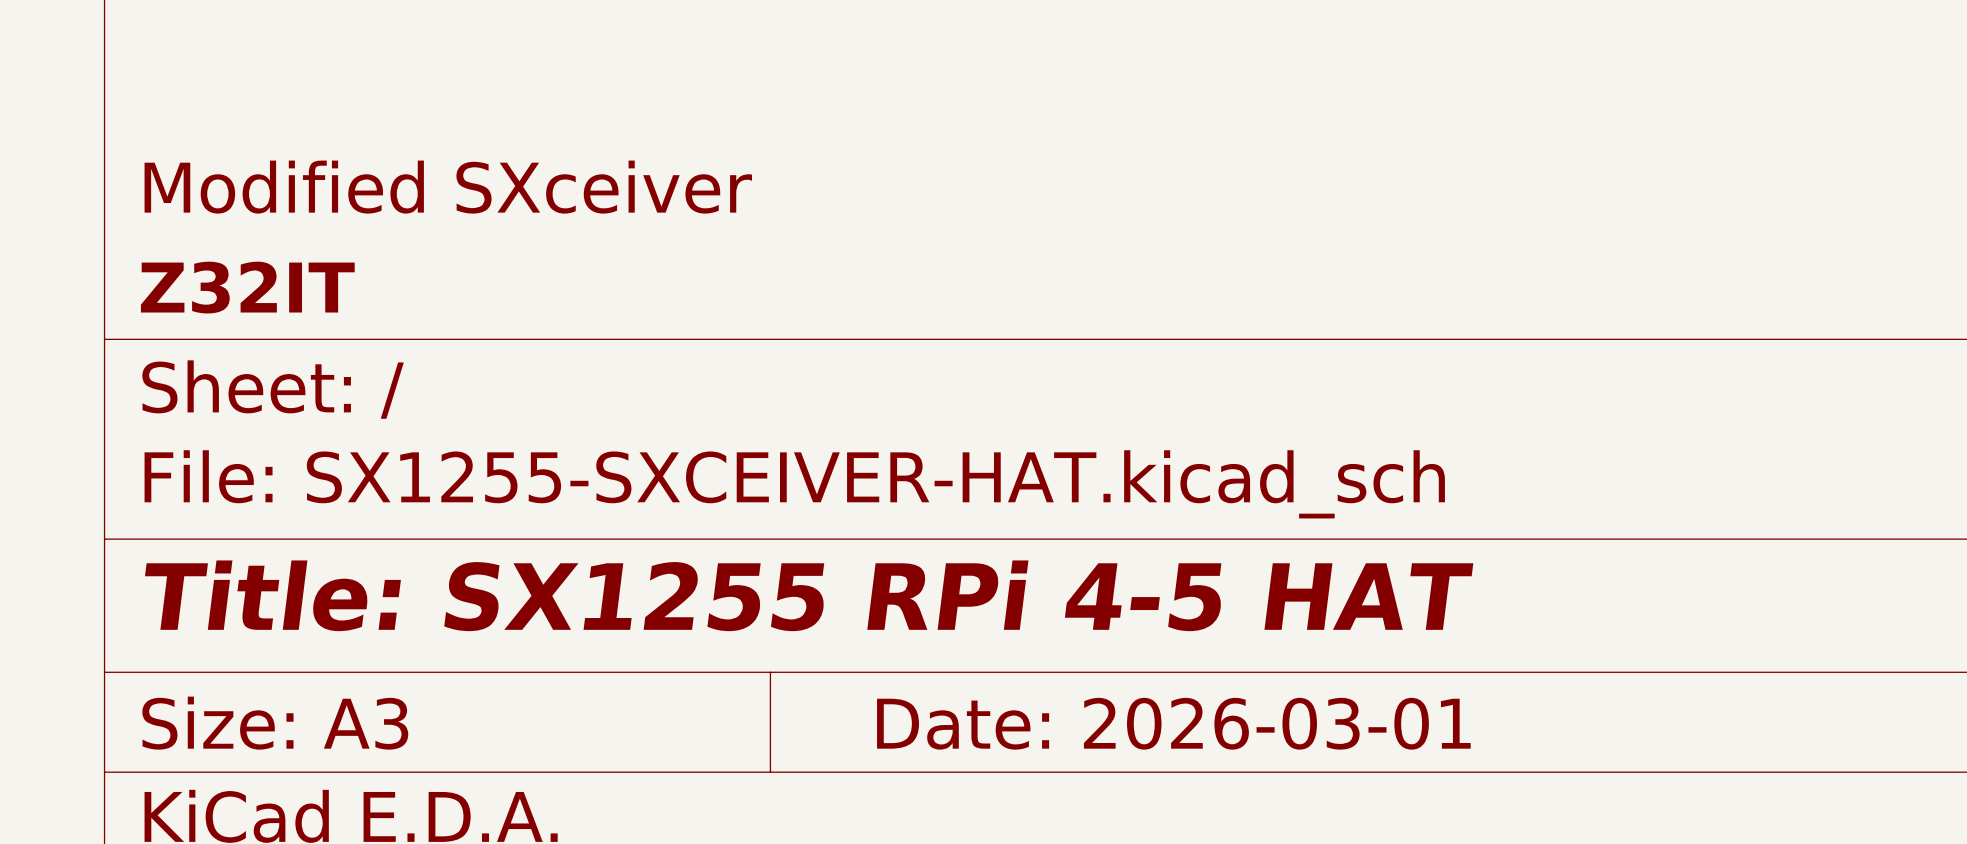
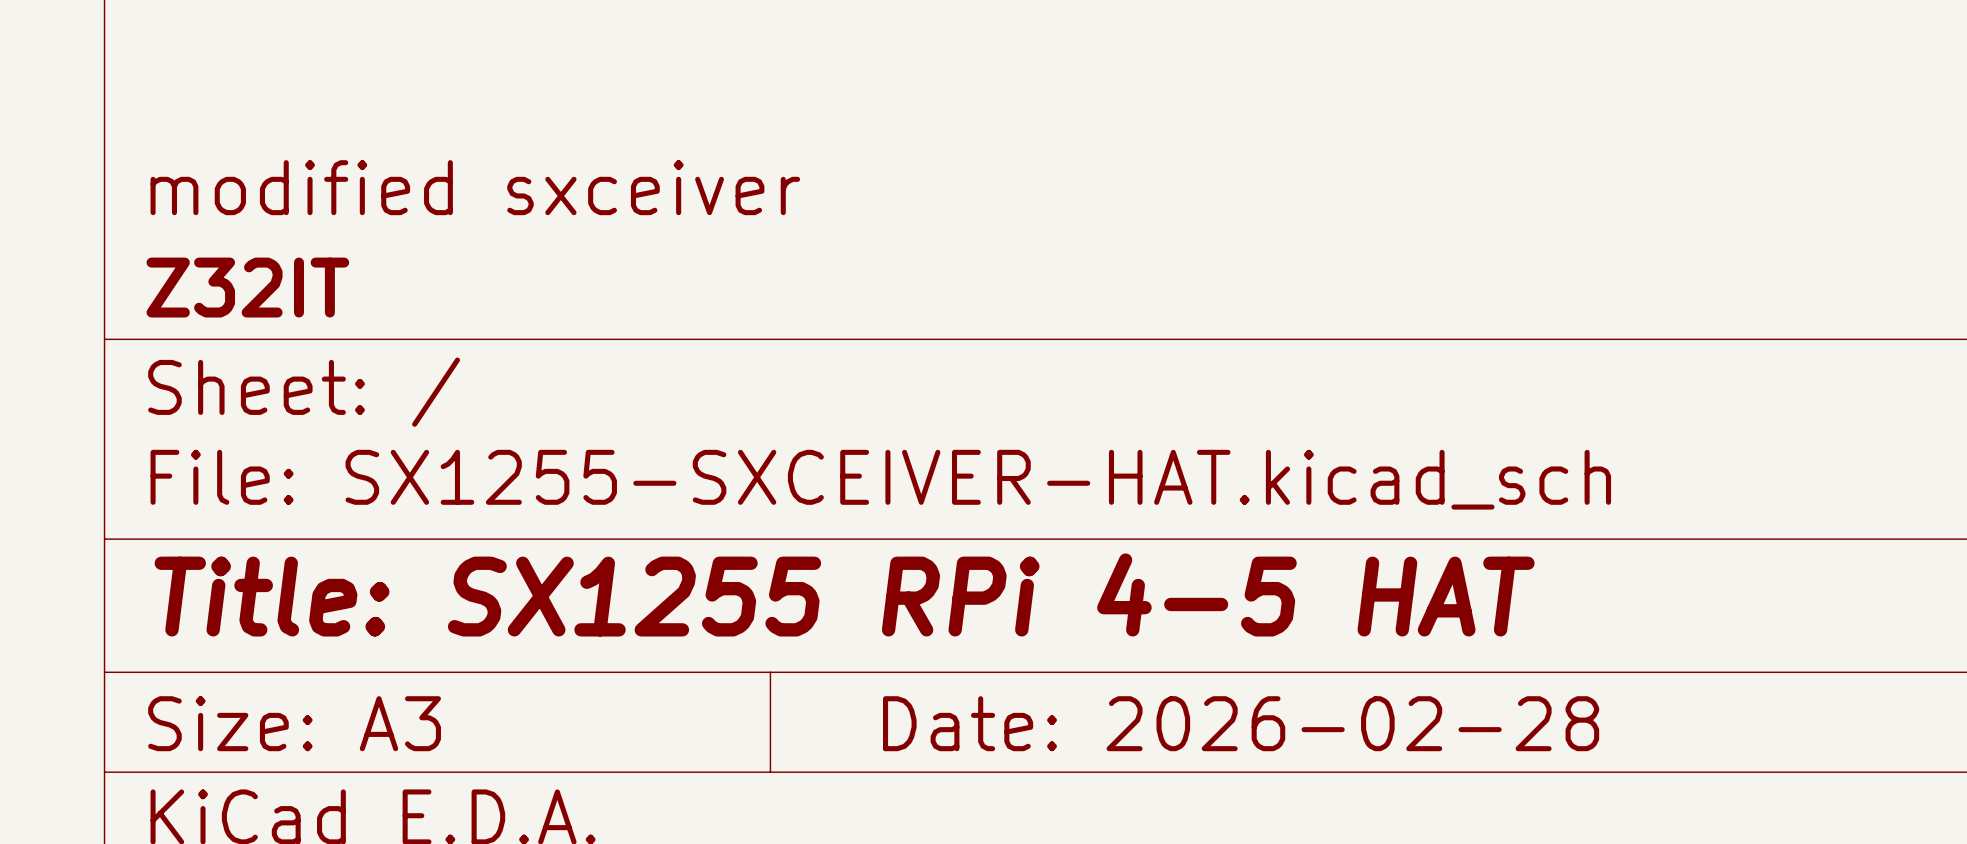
title block: Modified SXceiver (448, 187) -> modified sxceiver (475, 187)
title block: Date: 2026-03-01 (1173, 723) -> Date: 2026-02-28 (1241, 723)

